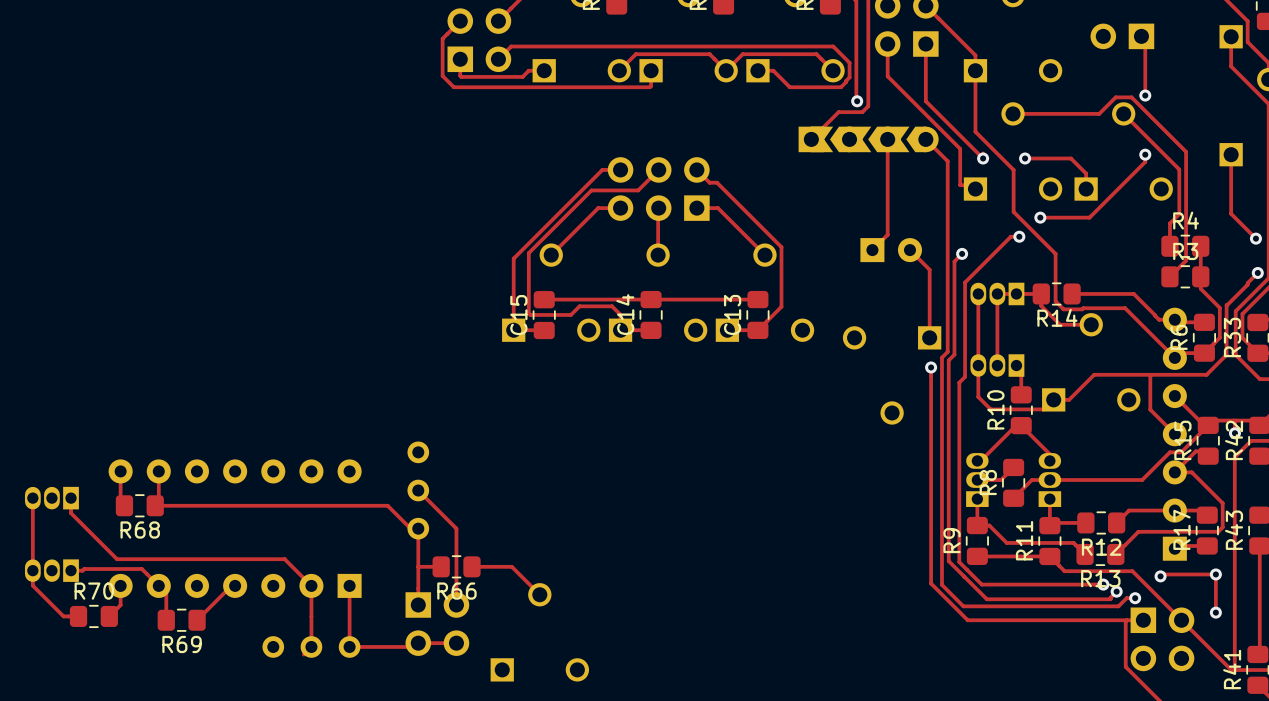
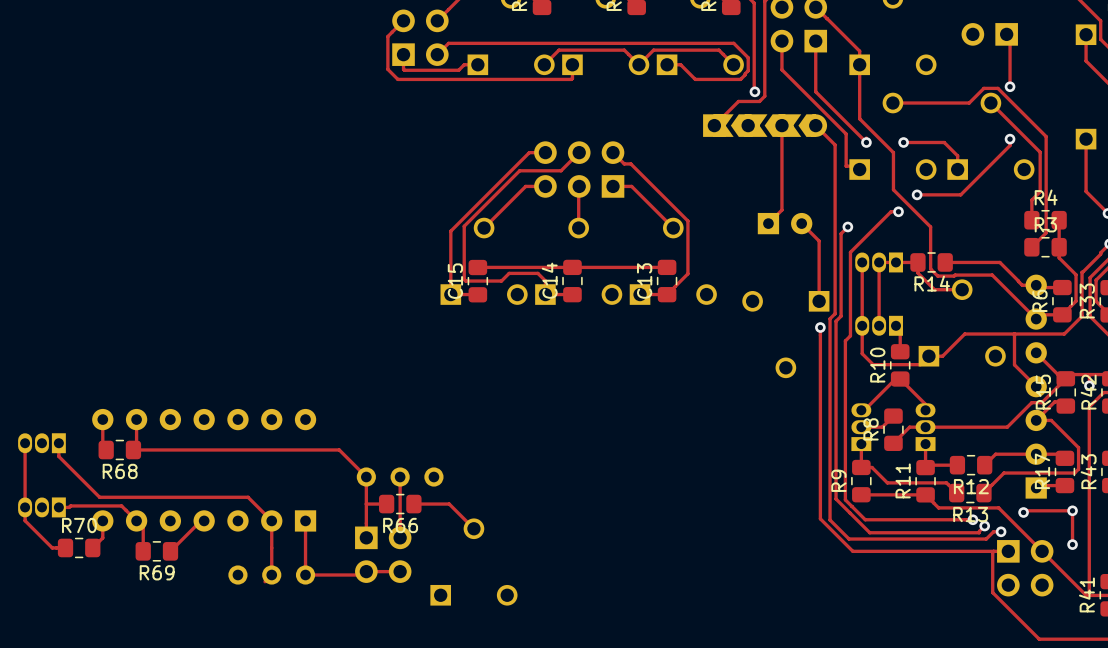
track: (418, 490) (456, 528) (456, 536) -> none
part rotation: 0° (418, 490) -> 90° clockwise (400, 477)
part position: (418, 490) -> (400, 477)

